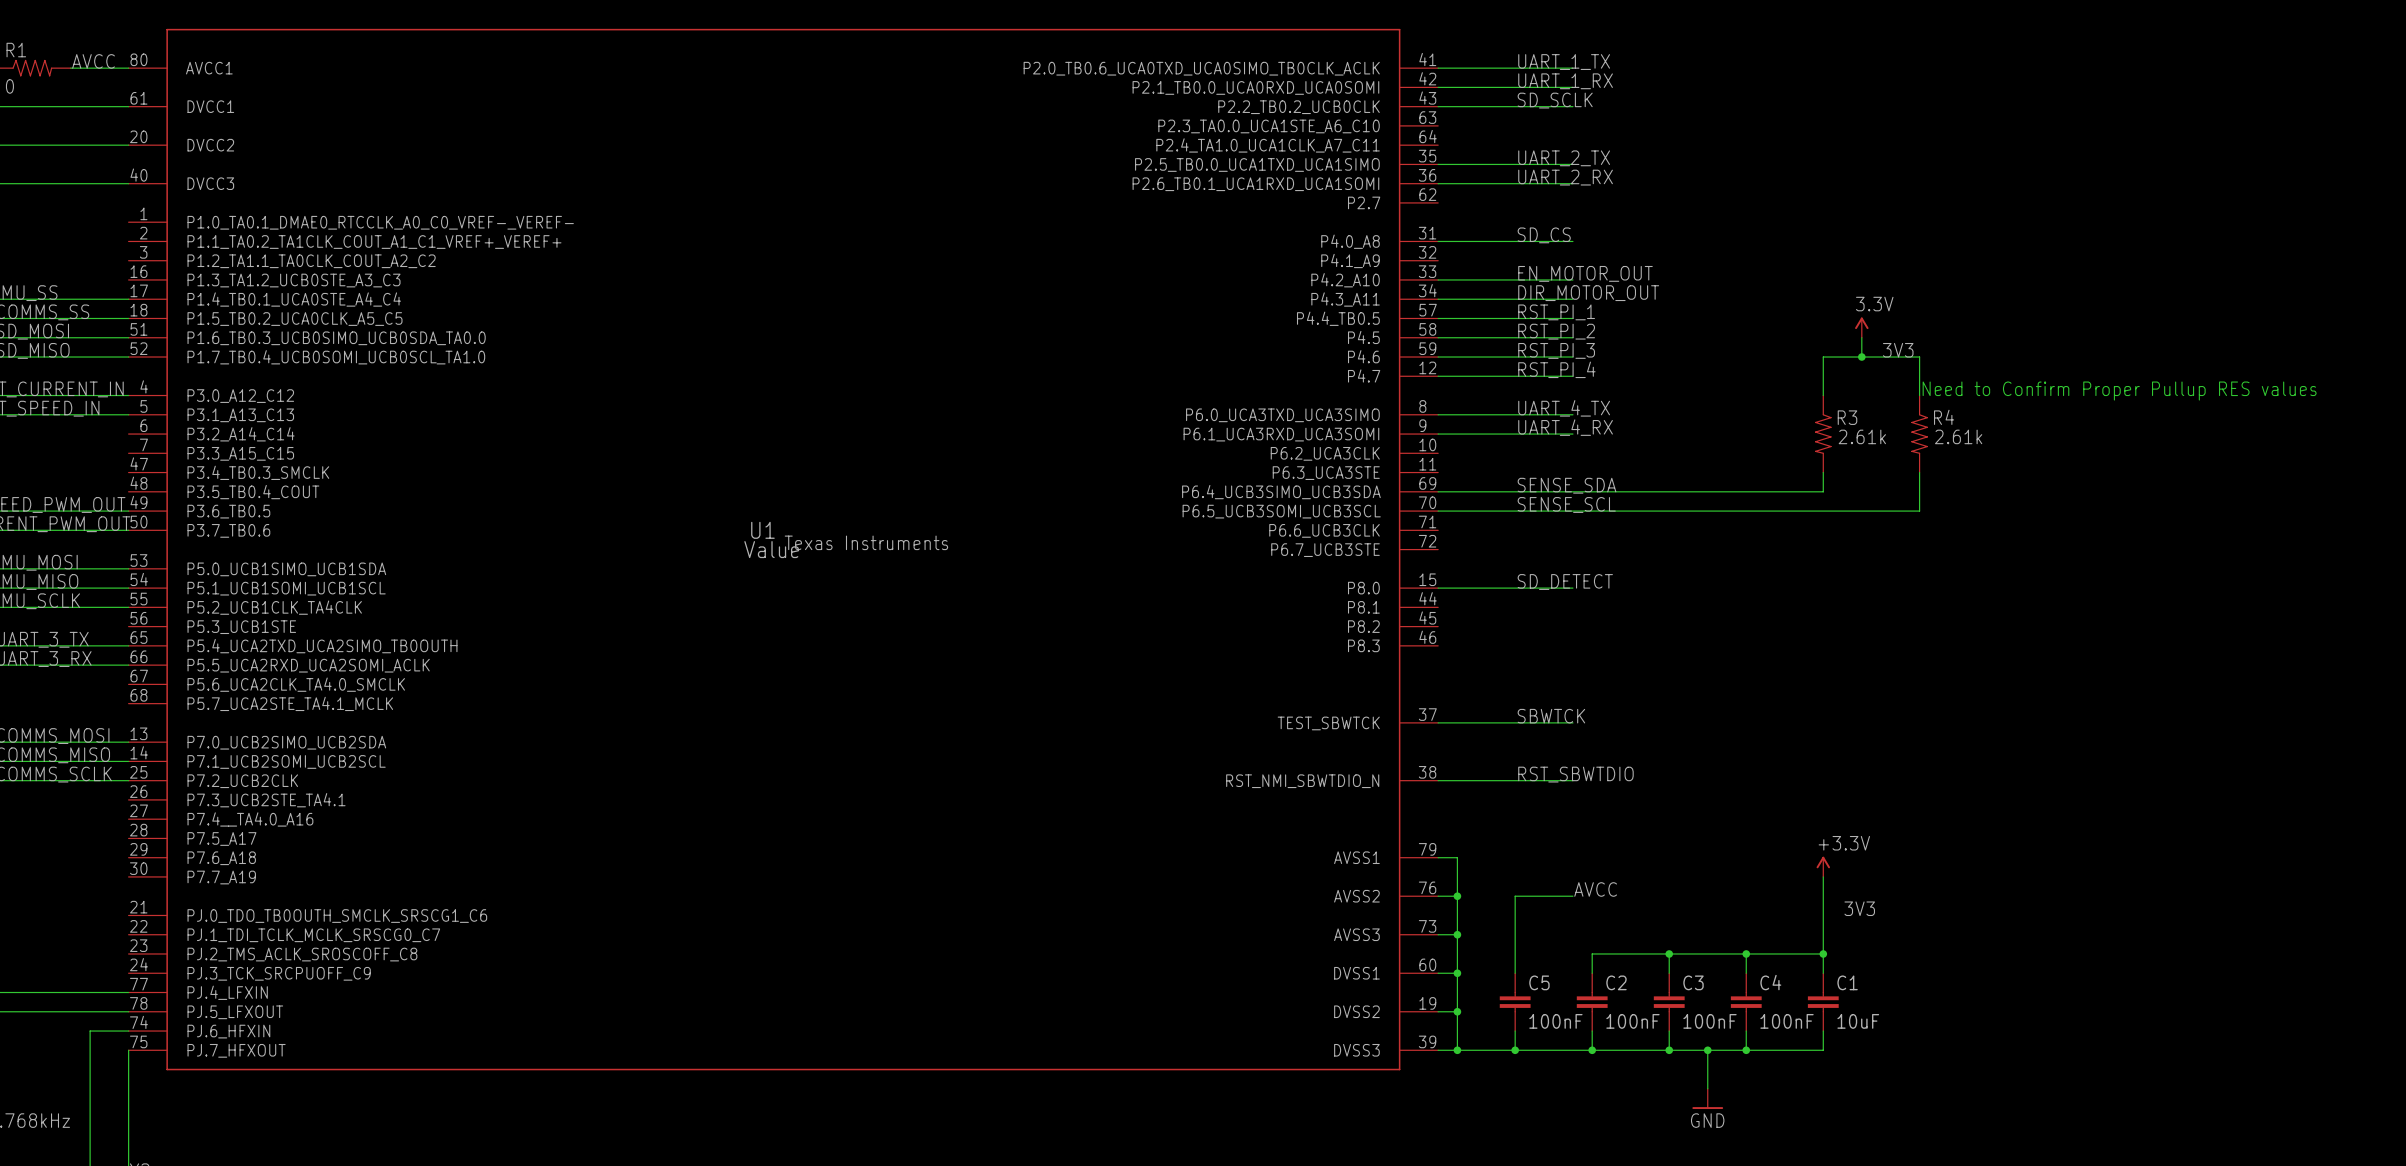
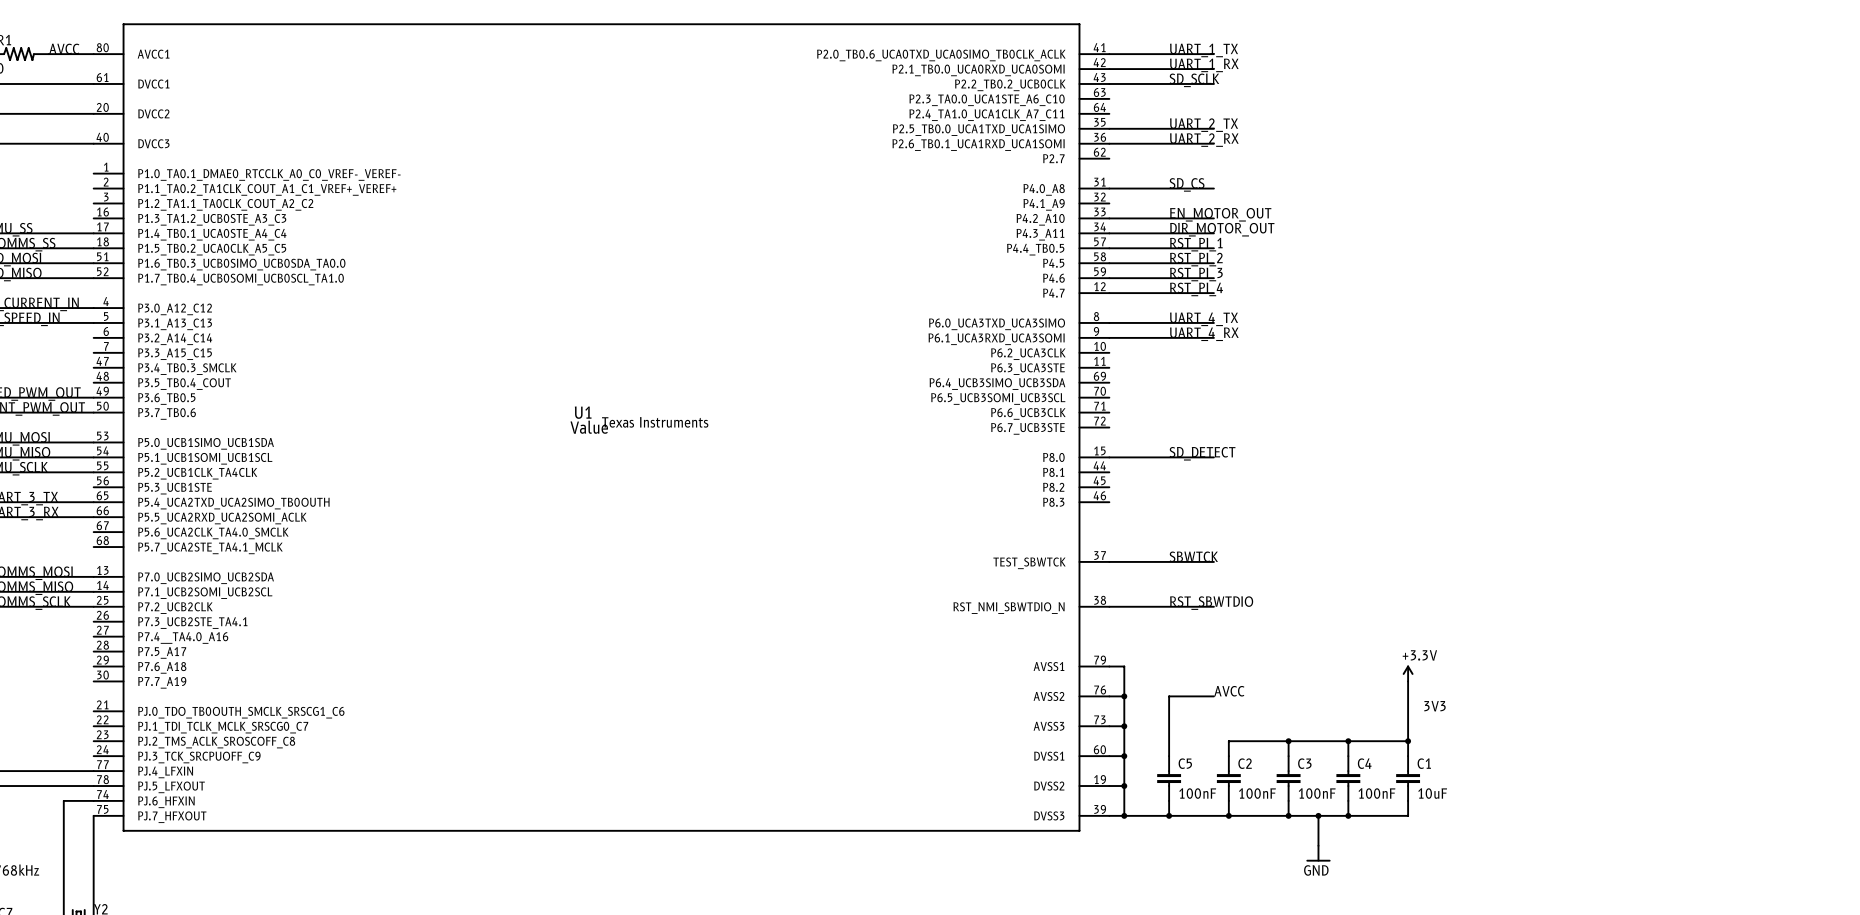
power symbol: 3.3V (1861, 327) -> none
wire: (1861, 337) (1861, 357) -> none
label: 3V3 (1898, 350) -> none
junction: (1861, 357) -> none
text: Need to Confirm Proper Pullup RES values (2119, 391) -> none
wire: (1823, 395) (1823, 357) (1919, 357) (1919, 395) -> none
R3: 2.61k (1823, 434) -> none
R4: 2.61k (1919, 434) -> none
wire: (1823, 472) (1823, 491) (1438, 491) -> none
wire: (1919, 472) (1919, 511) (1438, 511) -> none
label: SENSE_SDA (1567, 485) -> none
label: SENSE_SCL (1566, 504) -> none

